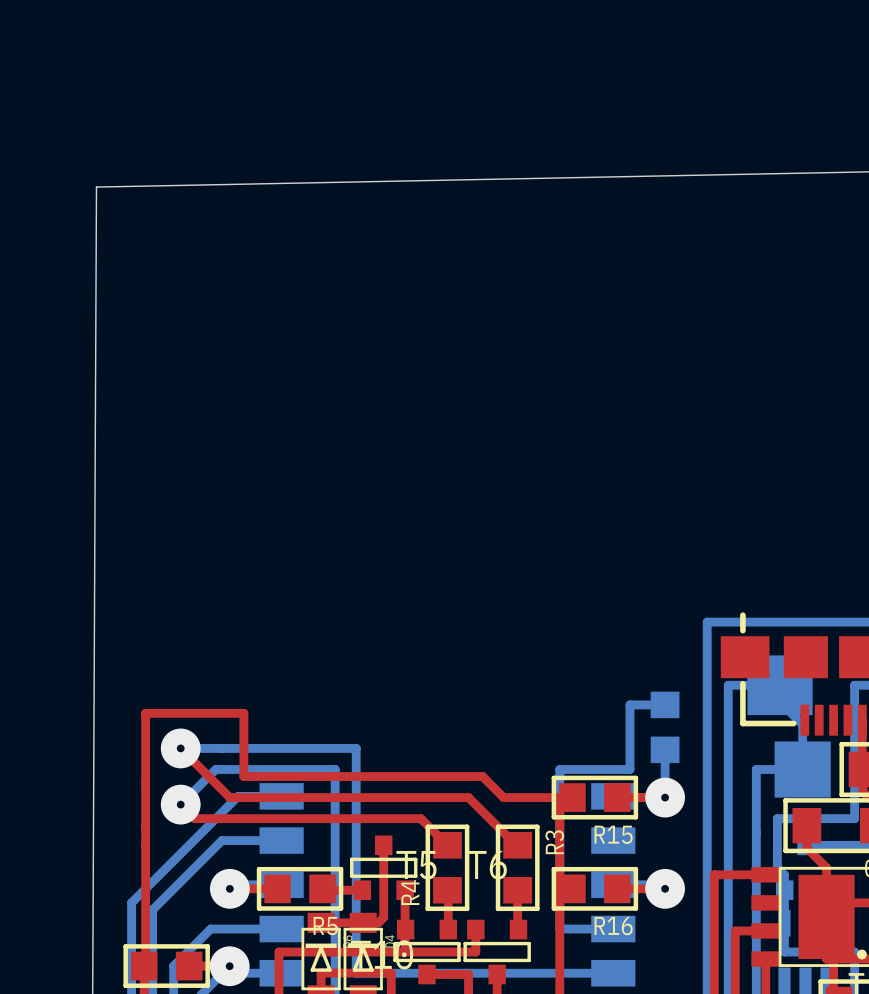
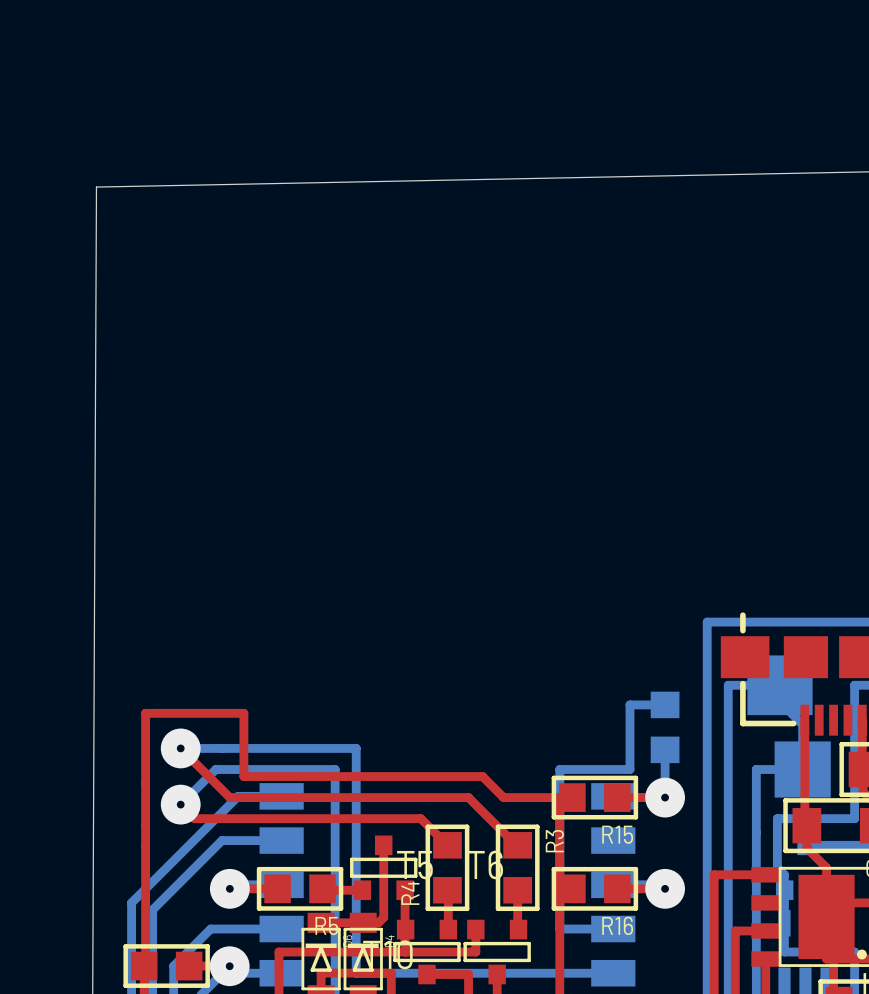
top track: none -> (804, 720) (804, 823) (806, 825)

